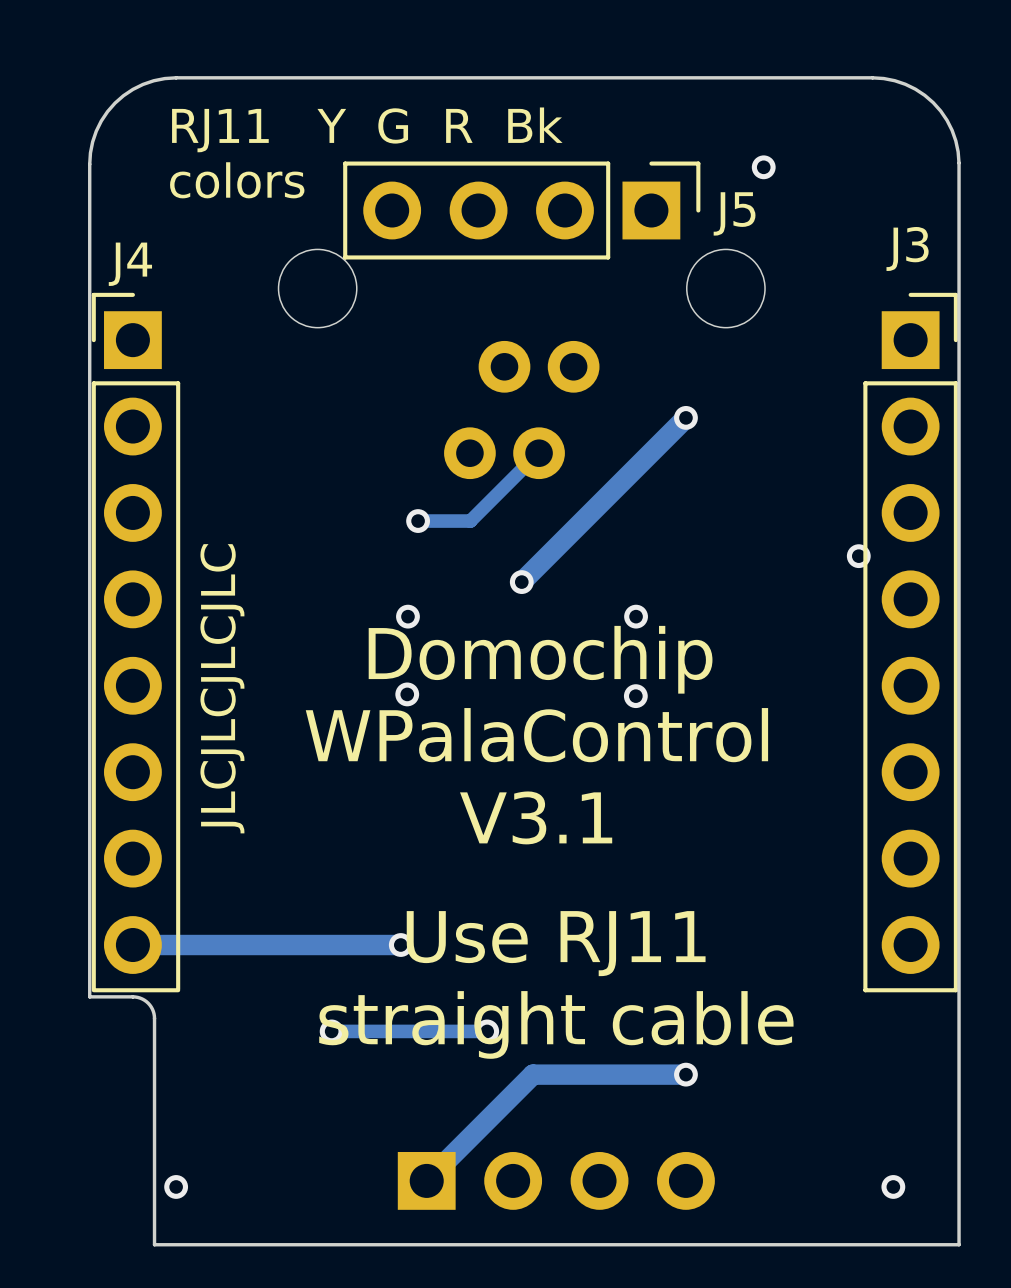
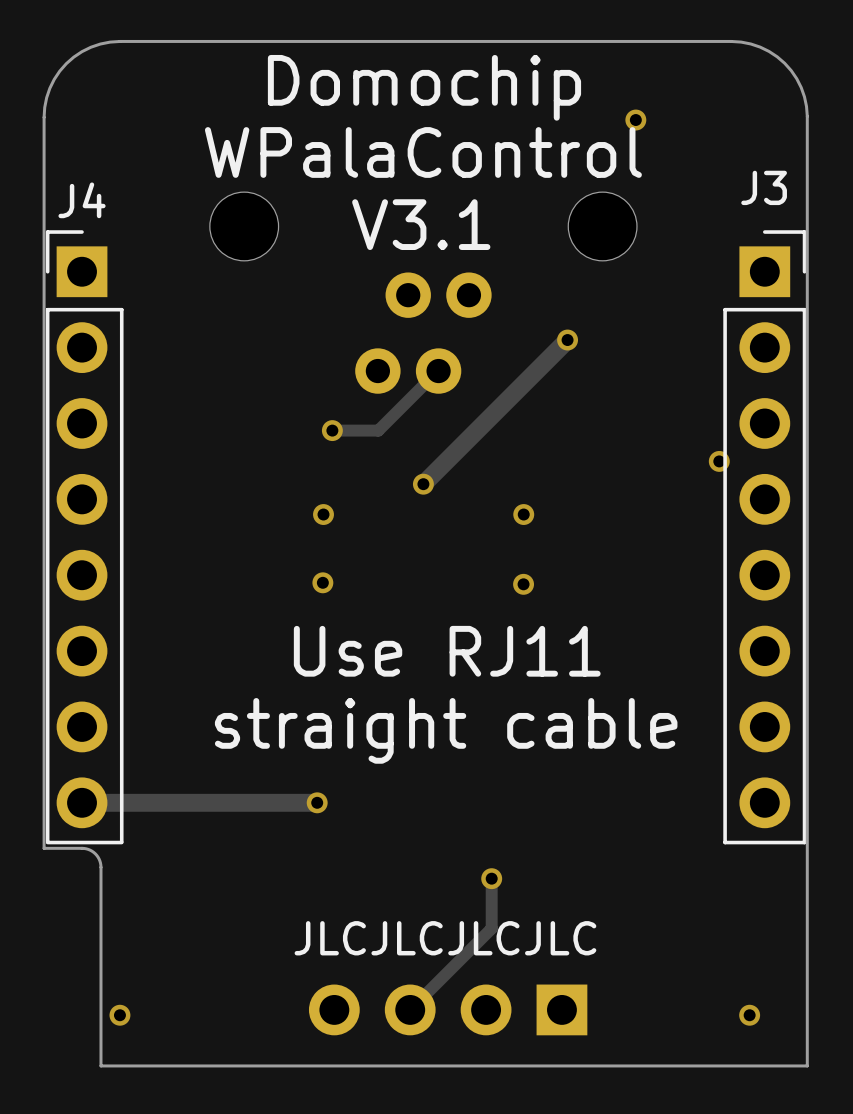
text: RJ11 Y G R Bk (367, 129) -> none
text: colors (237, 180) -> none
J5: (521, 210) -> none
text position: Domochip (540, 659) -> Domochip (424, 87)
text rotation: 0° (222, 688) -> 90° clockwise (445, 938)
text position: JLCJLCJLCJLC (222, 688) -> JLCJLCJLCJLC (445, 938)
text position: WPalaControl (536, 735) -> WPalaControl (423, 152)
text position: V3.1 (536, 817) -> V3.1 (421, 224)
text position: Use RJ11 (556, 943) -> Use RJ11 (447, 651)
text position: straight cable (556, 1024) -> straight cable (446, 730)
via: (331, 1031) -> none
track: (487, 1031) (331, 1031) -> none
via: (487, 1031) -> none
track: none -> (491, 878) (491, 928) (410, 1009)
via: none -> (491, 878)
track: (685, 1074) (533, 1074) (426, 1180) -> none
via: (685, 1074) -> none
part rotation: 0° (556, 1180) -> 180° (448, 1009)

